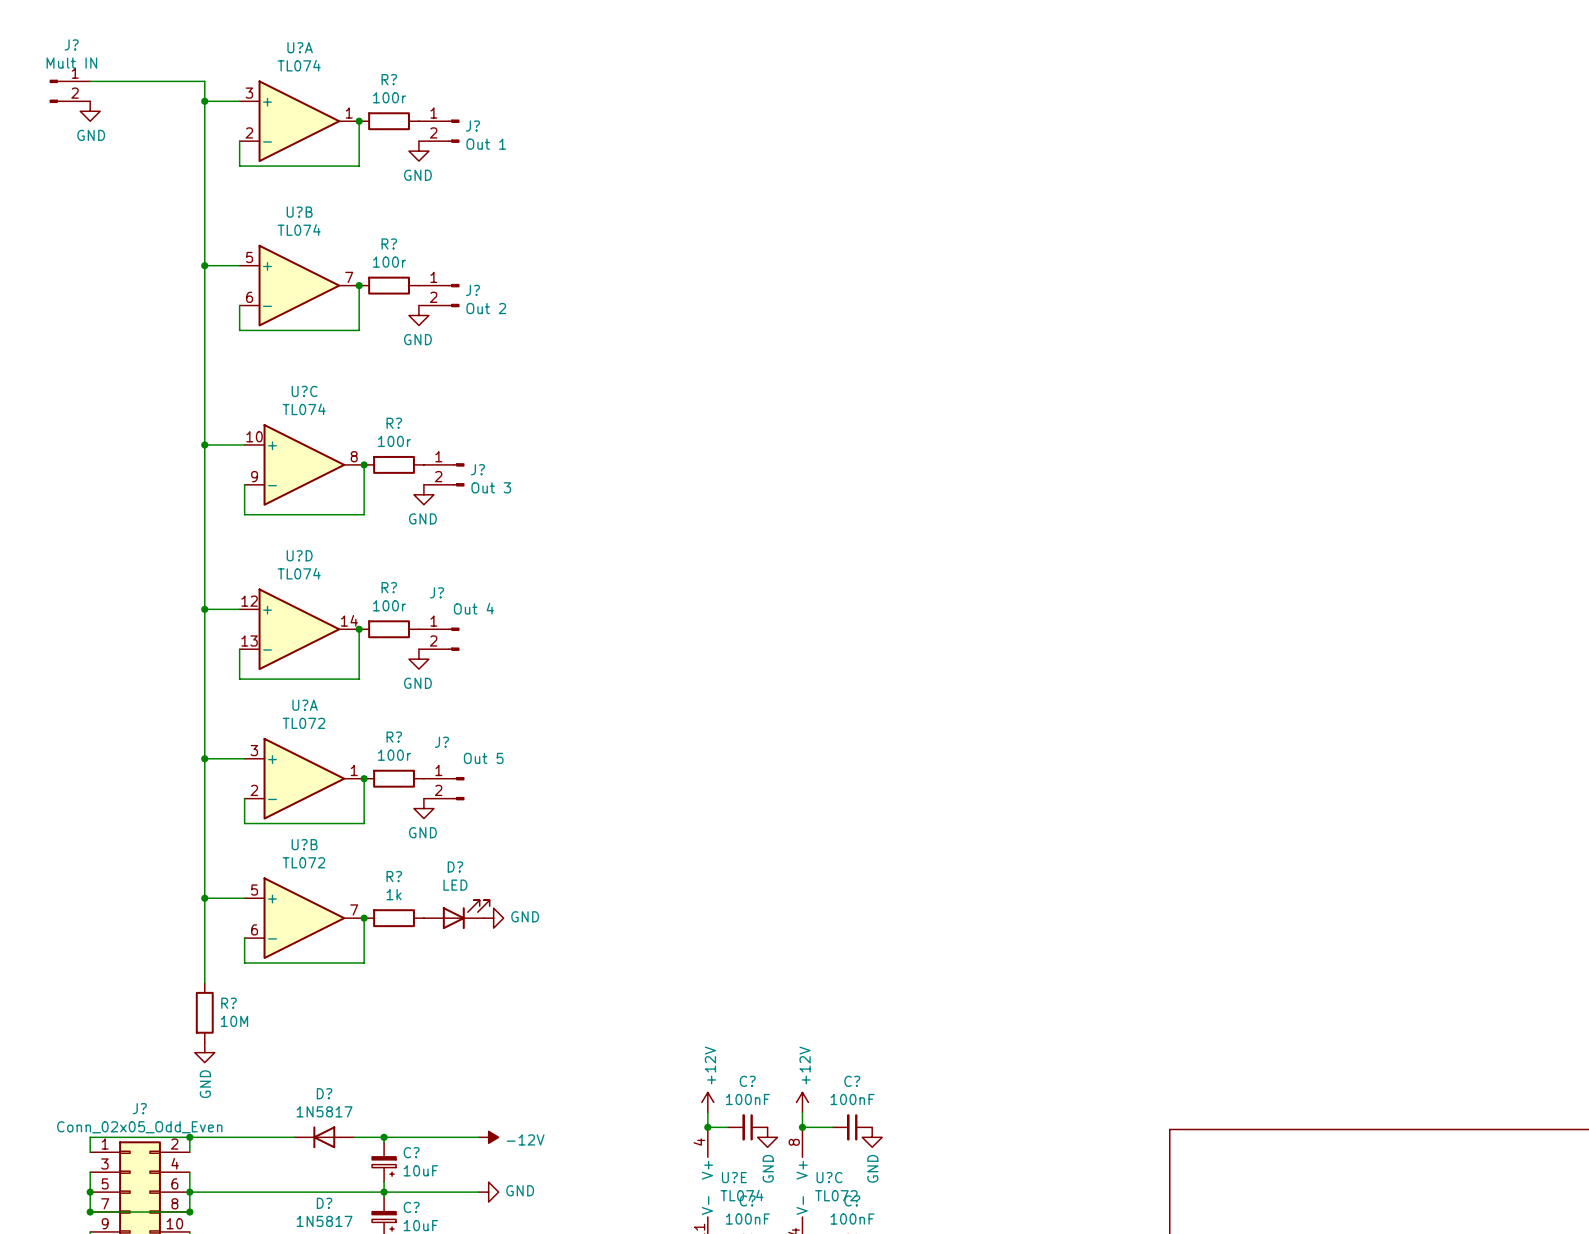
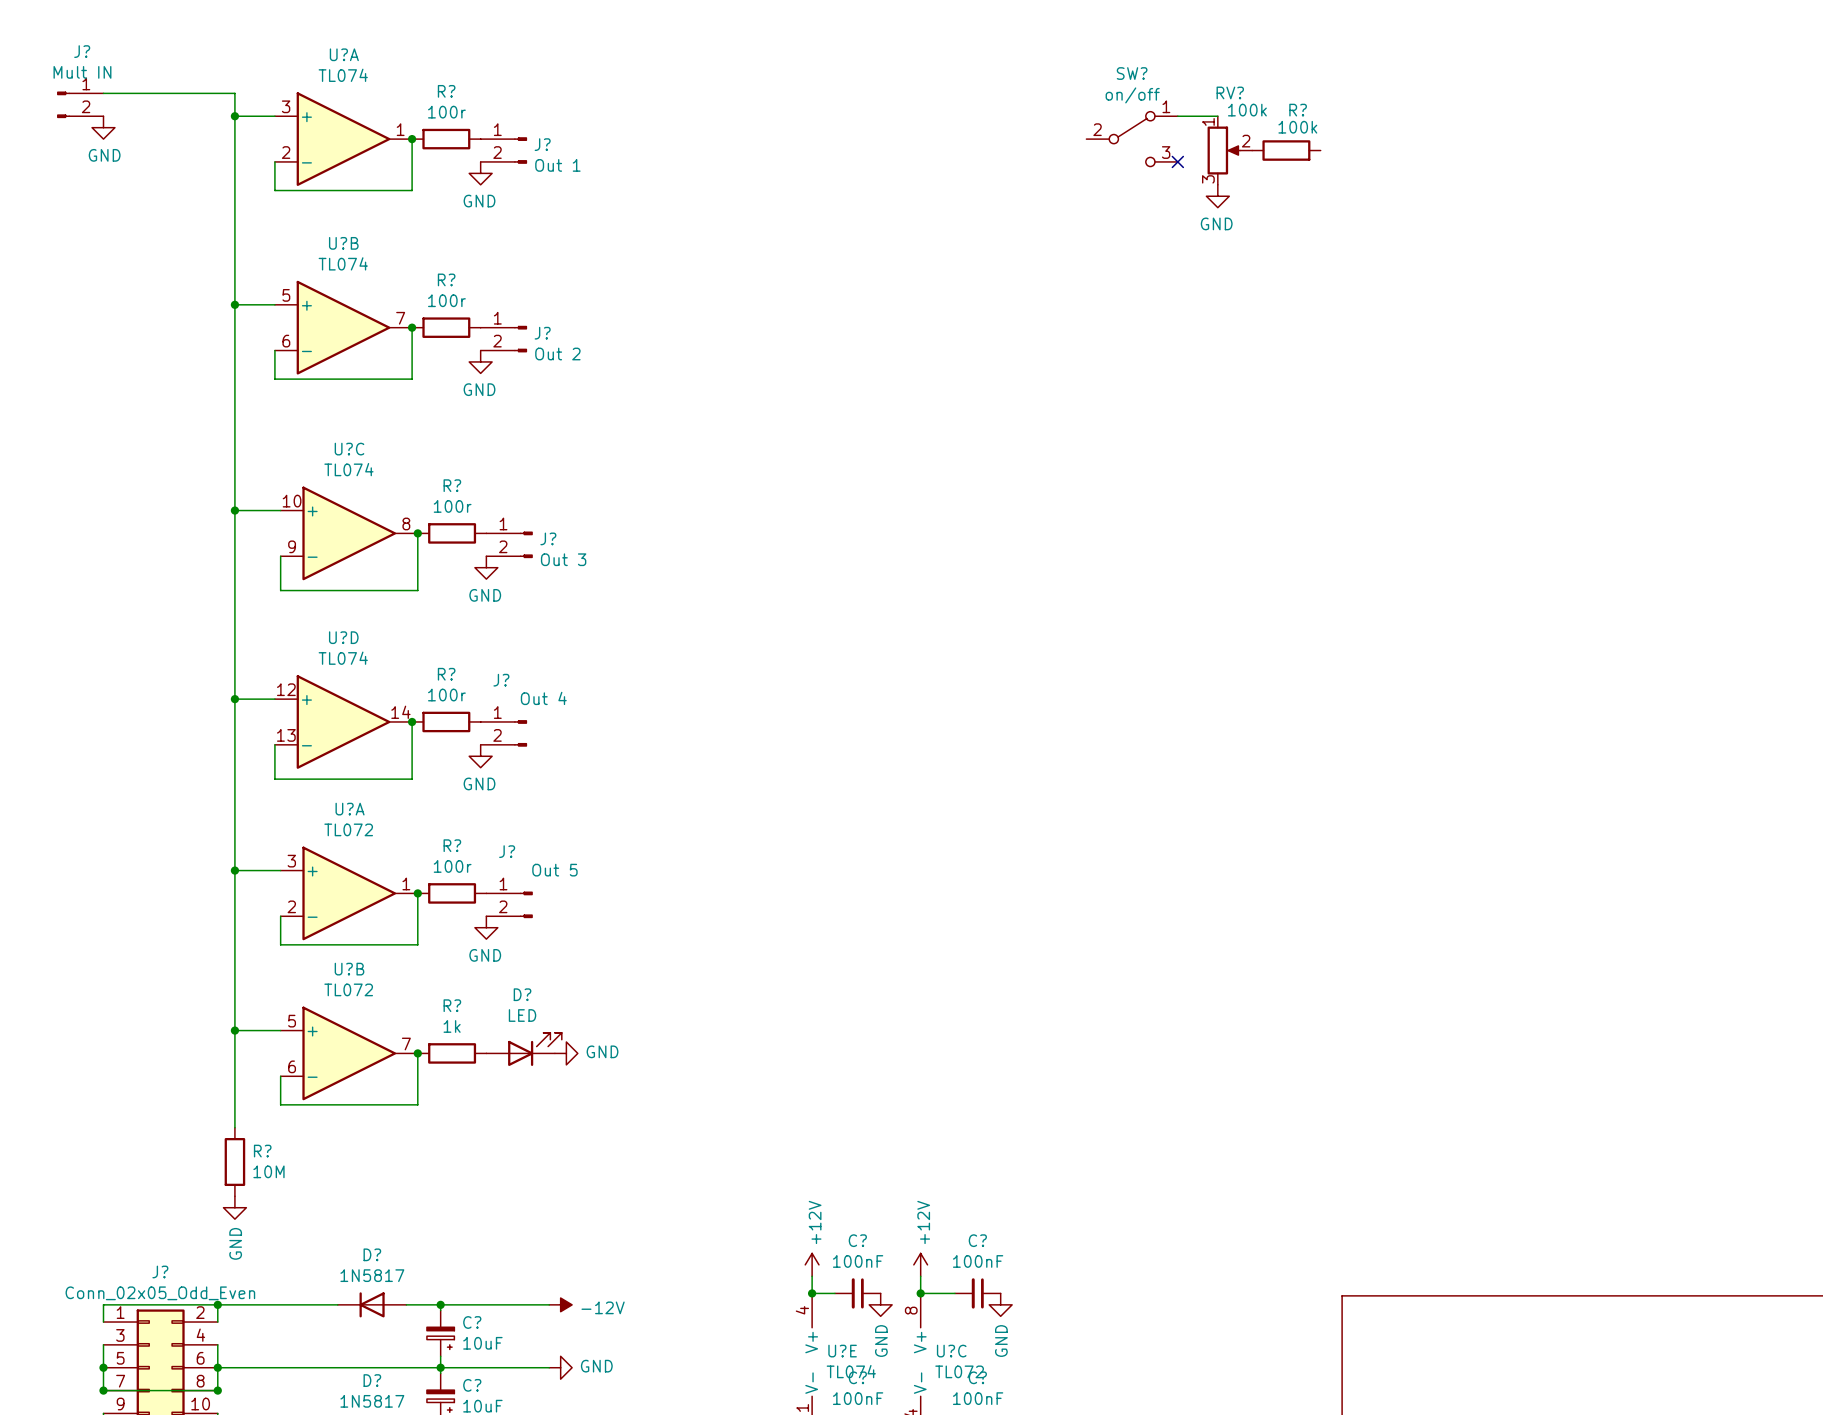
wire: none -> (1177, 116) (1217, 116)
SW?: none -> on/off (1132, 139)
RV?: none -> 100k (1229, 150)
R?: none -> 100k (1286, 150)
no-connect mark: none -> (1177, 161)
power symbol: none -> GND (1217, 196)

